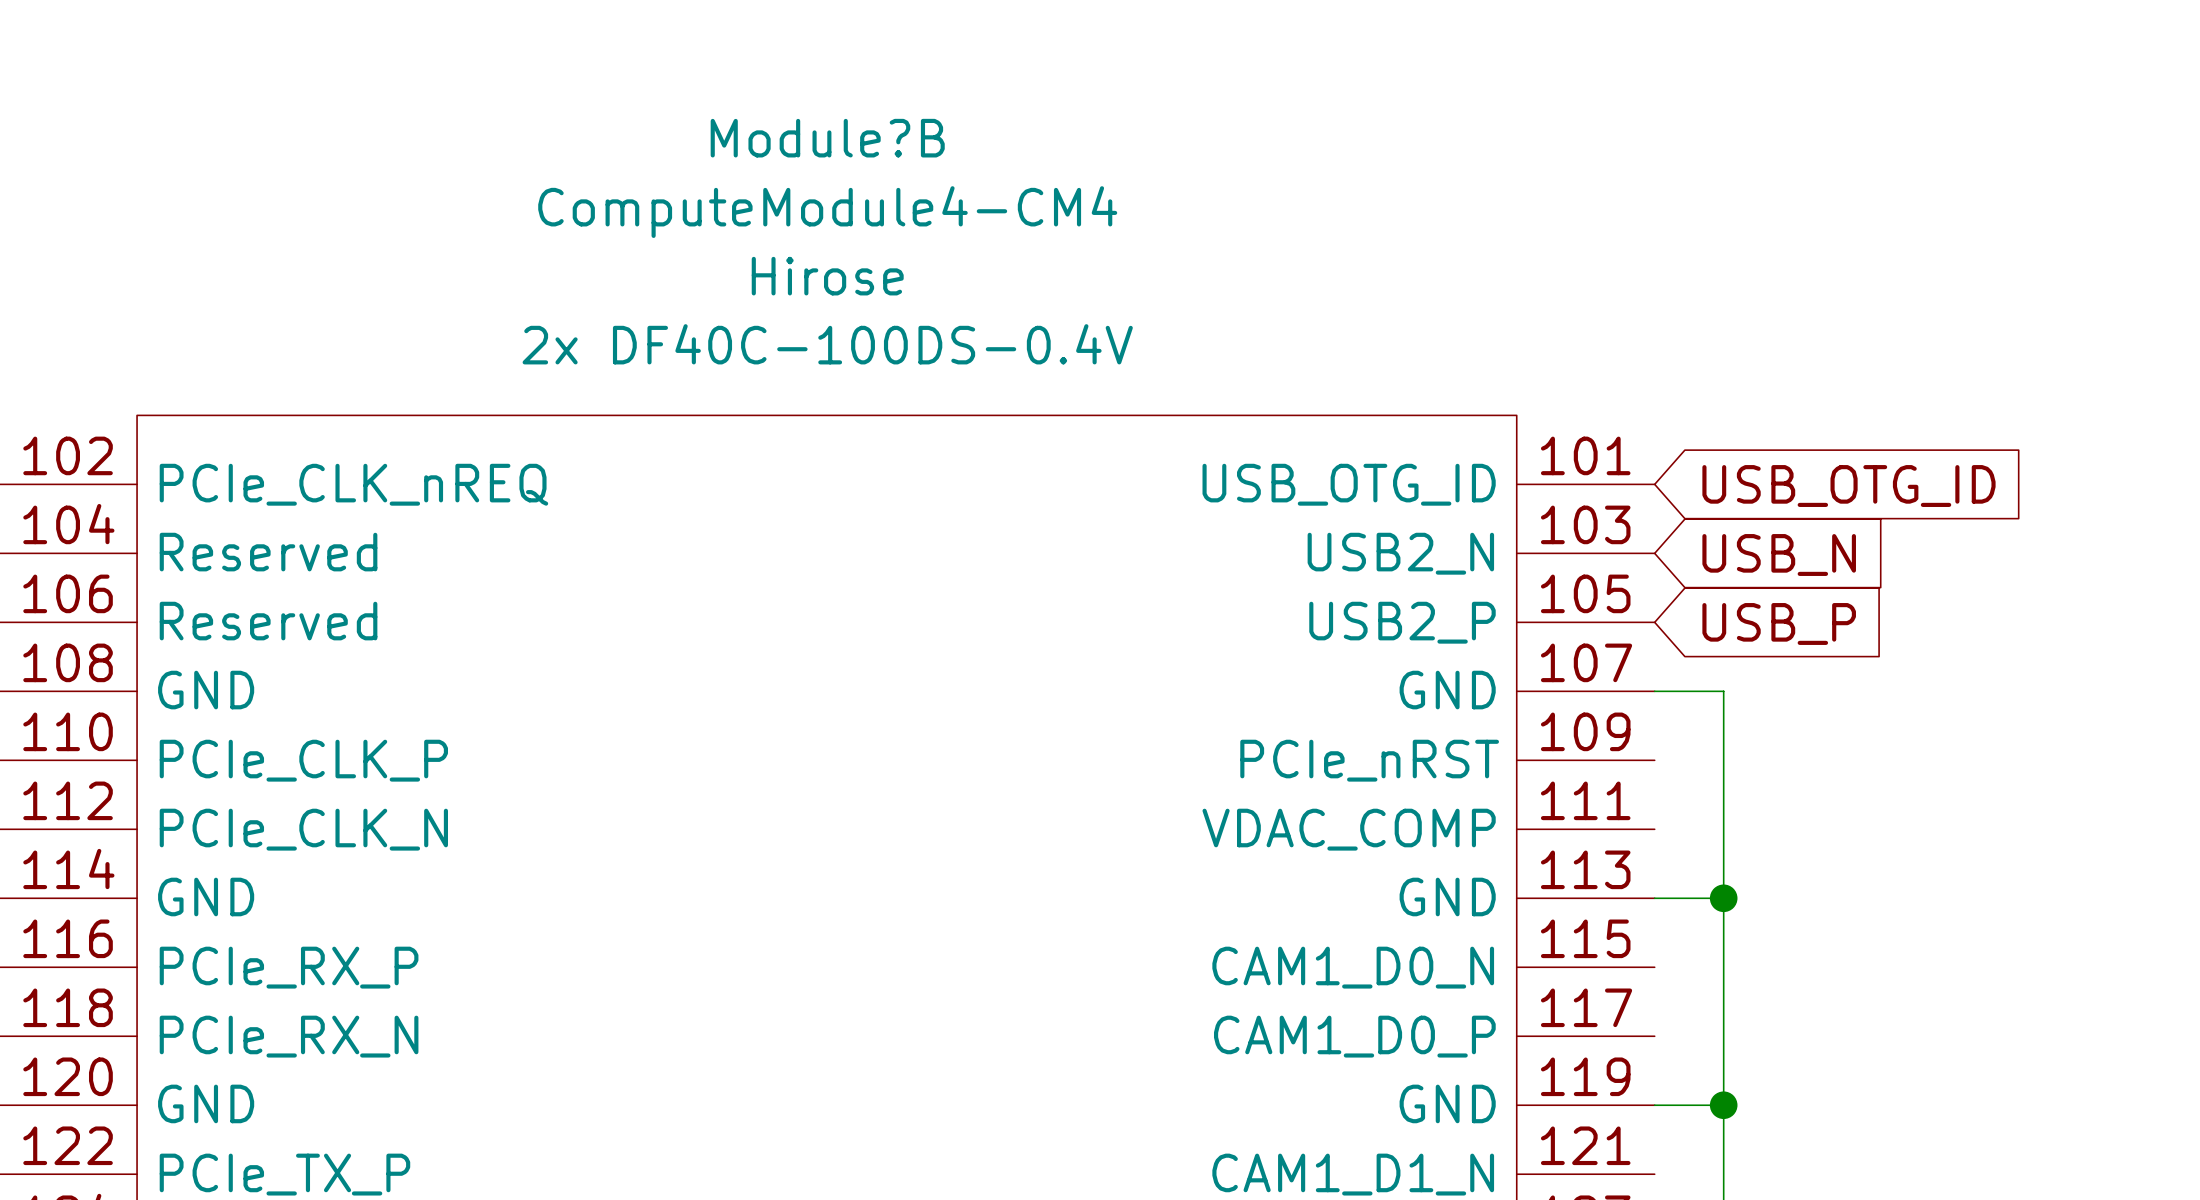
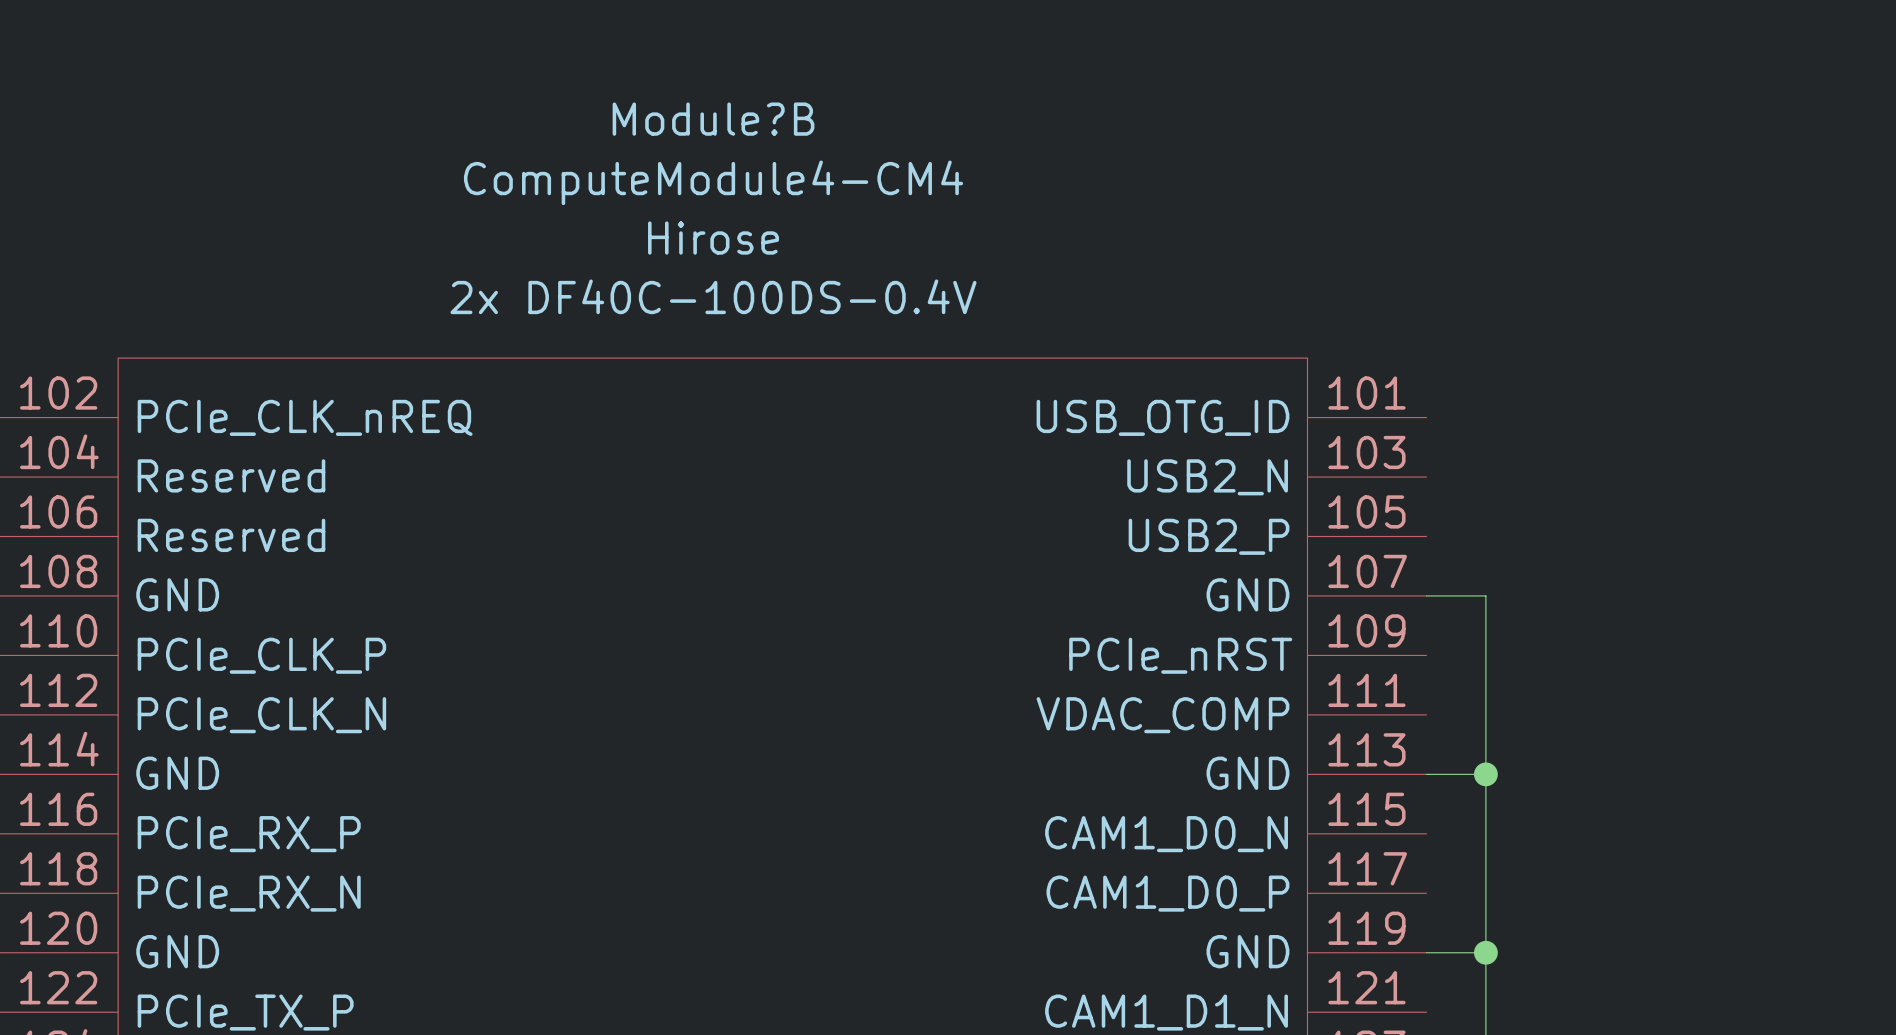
global label: USB_OTG_ID (1848, 486) -> none
global label: USB_N (1779, 555) -> none
global label: USB_P (1779, 623) -> none

